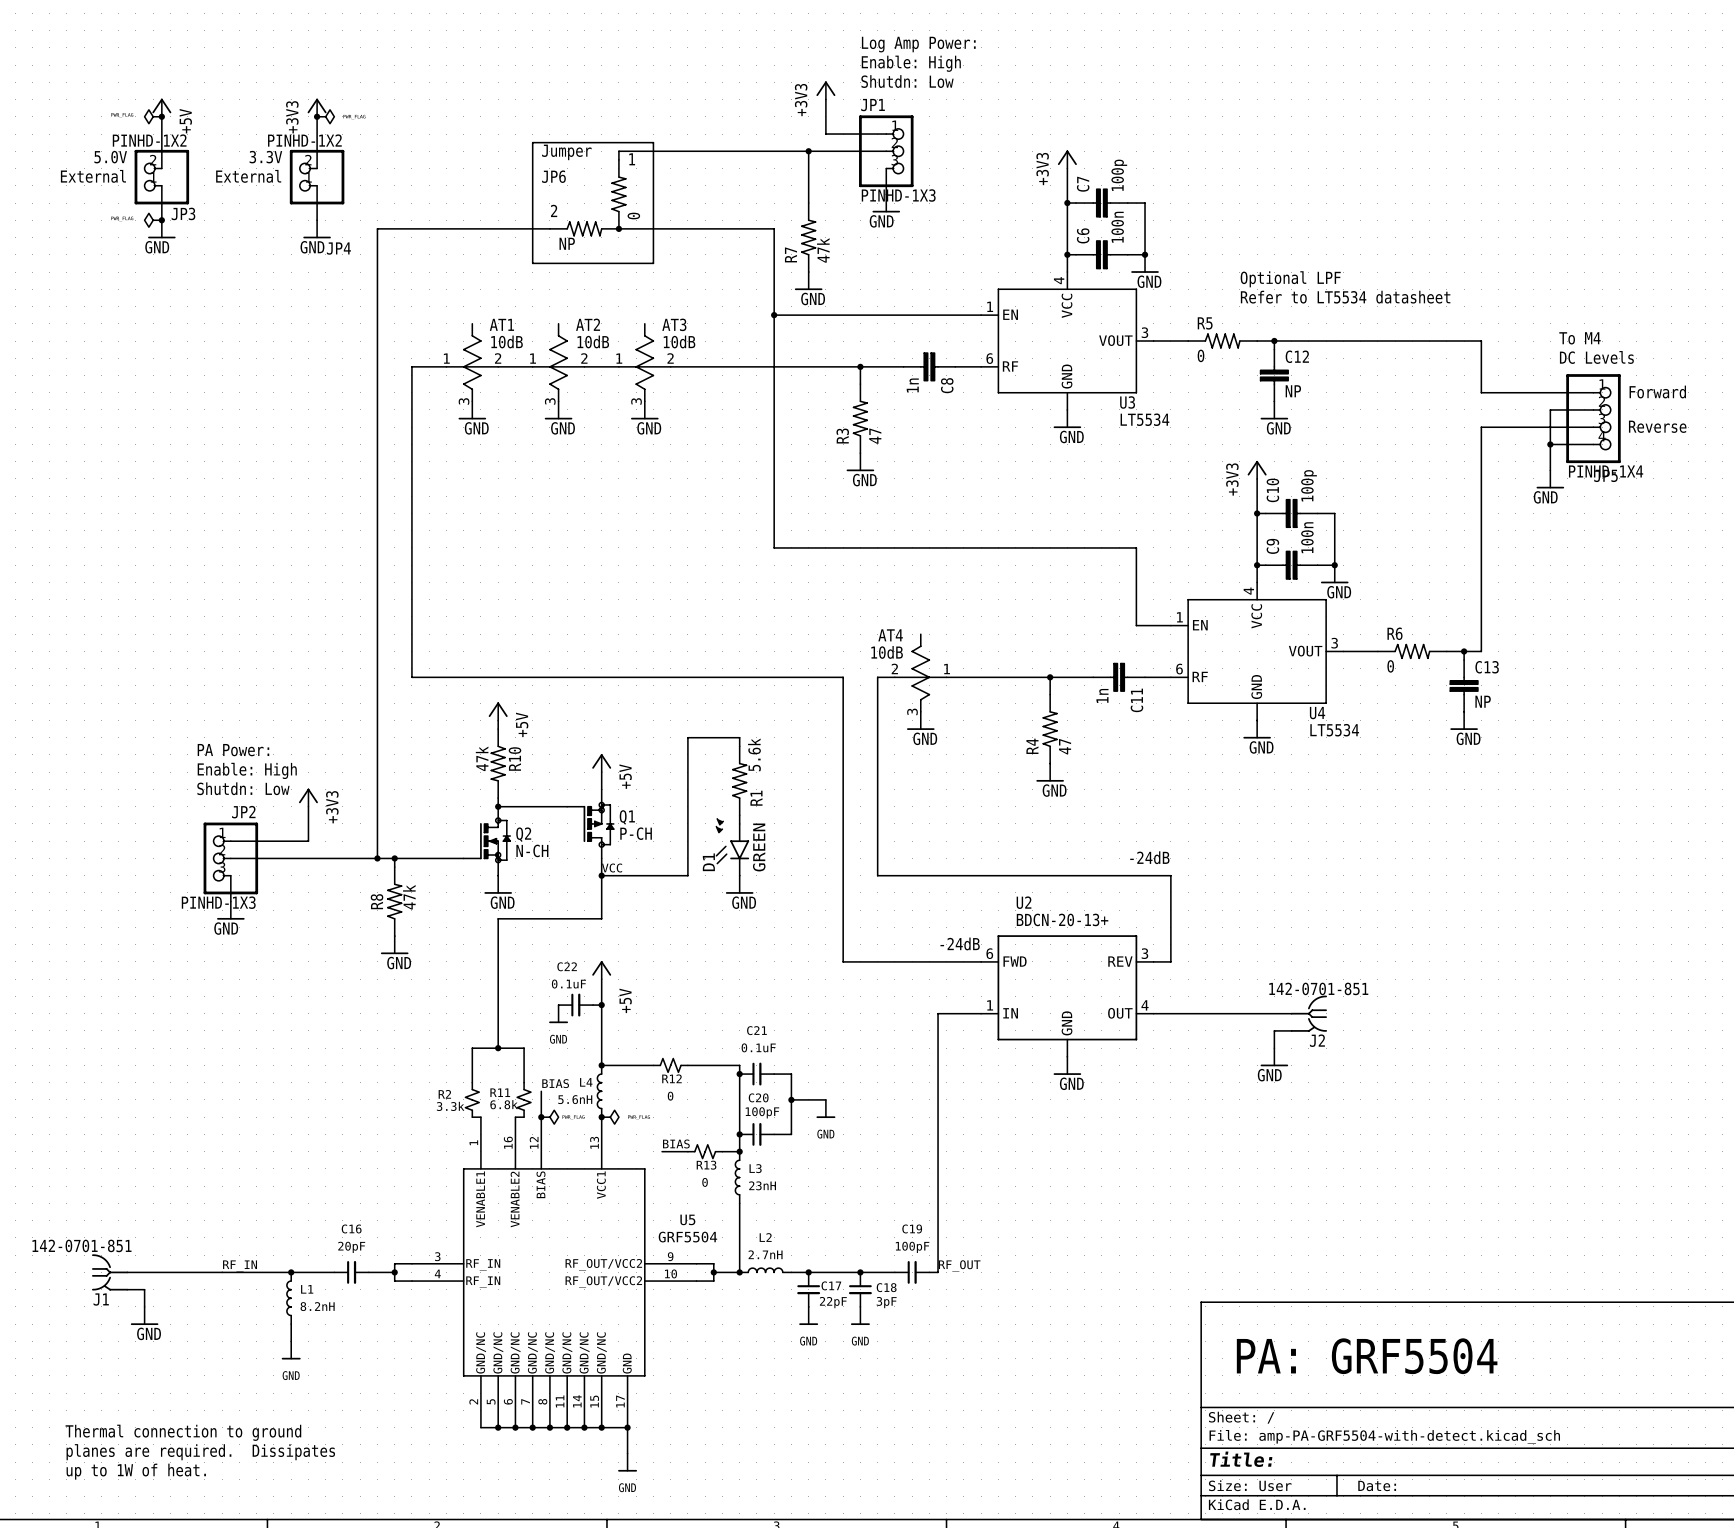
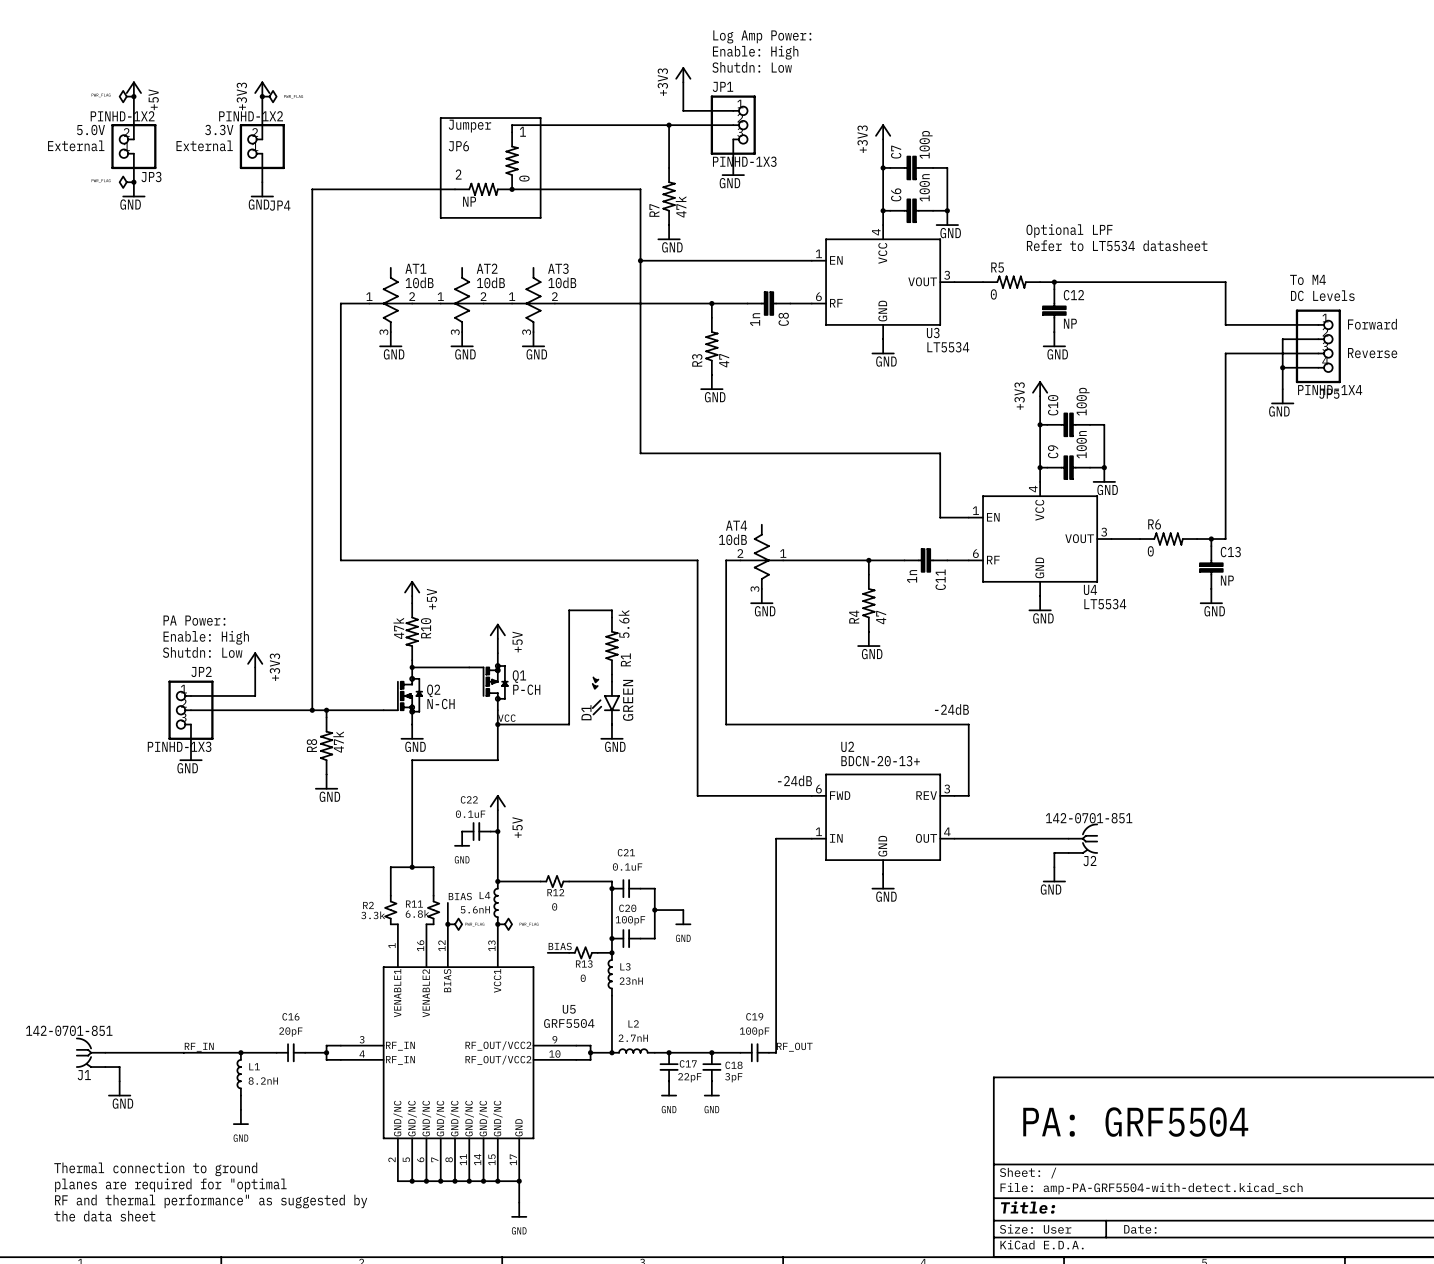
text: none -> Thermal connection to ground (155, 1169)
text: Thermal connection to ground (183, 1432) -> planes are required for "optimal (170, 1185)
text: planes are required. Dissipates (200, 1452) -> RF and thermal performance" as suggested by (211, 1201)
text: up to 1W of heat. (136, 1471) -> the data sheet (104, 1216)

